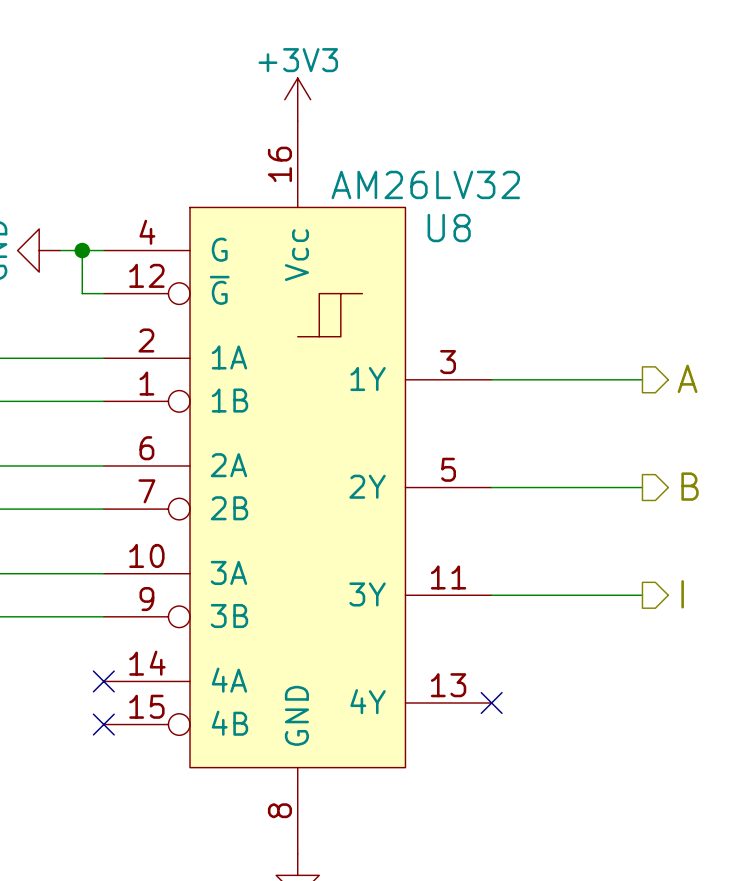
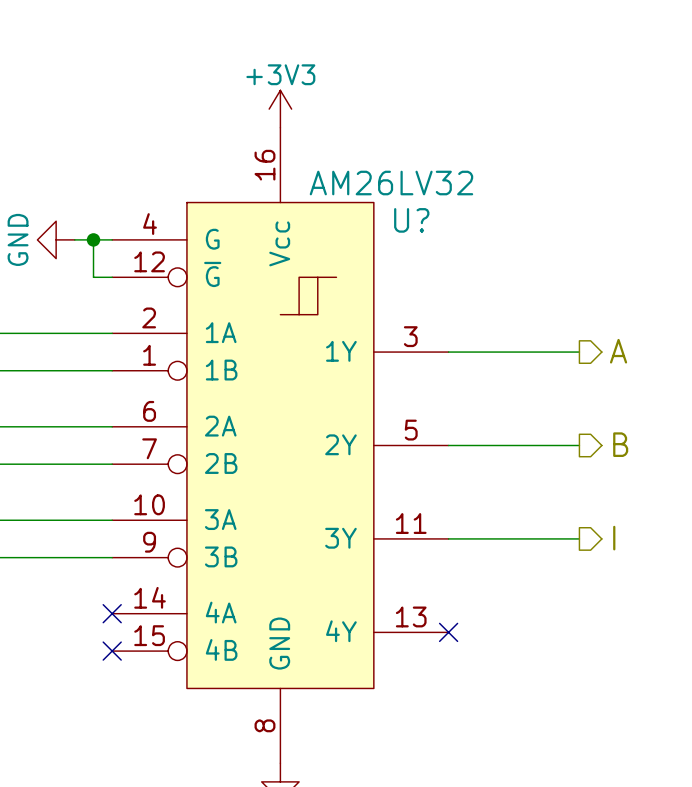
U8 name: U8 (449, 228) -> U? (411, 220)

